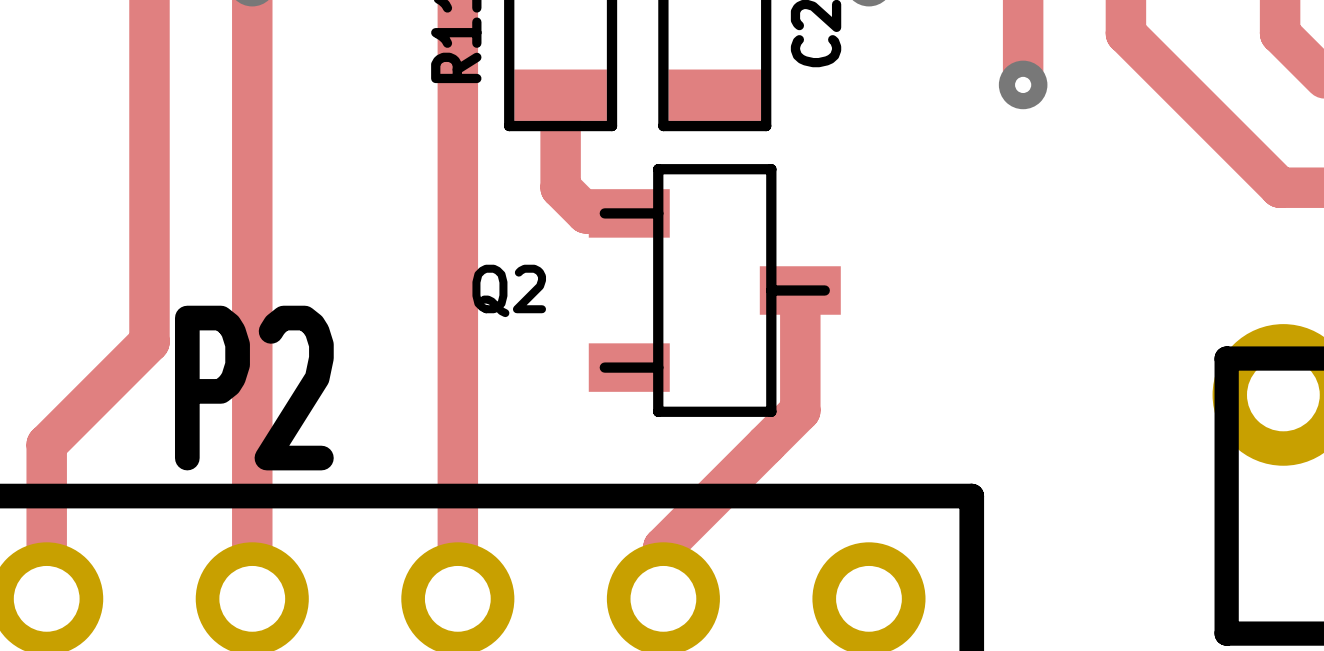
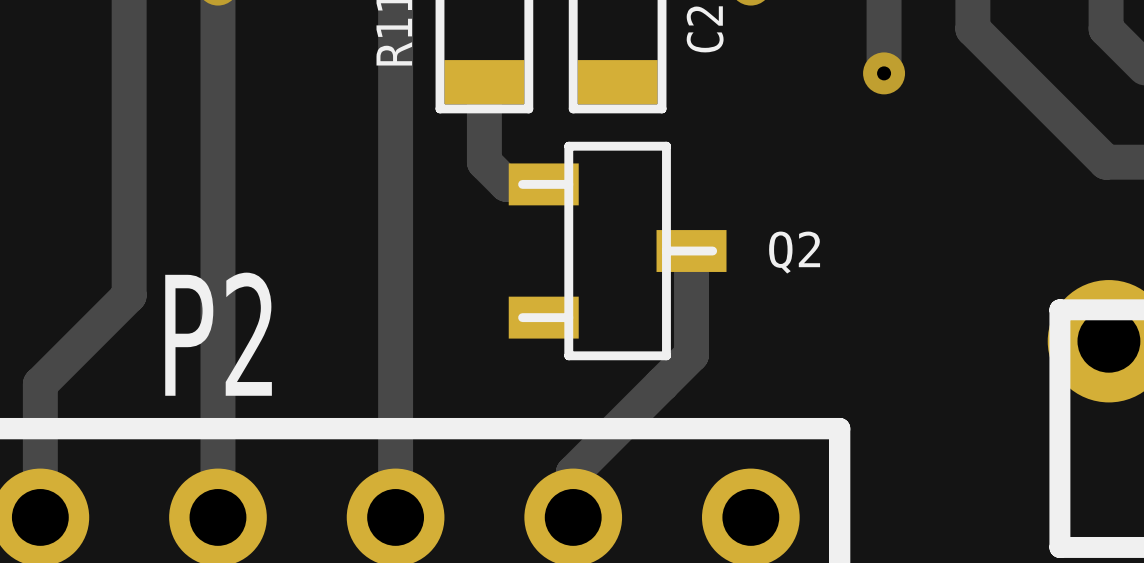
Q2 name position: Q2 (509, 290) -> Q2 (794, 252)

